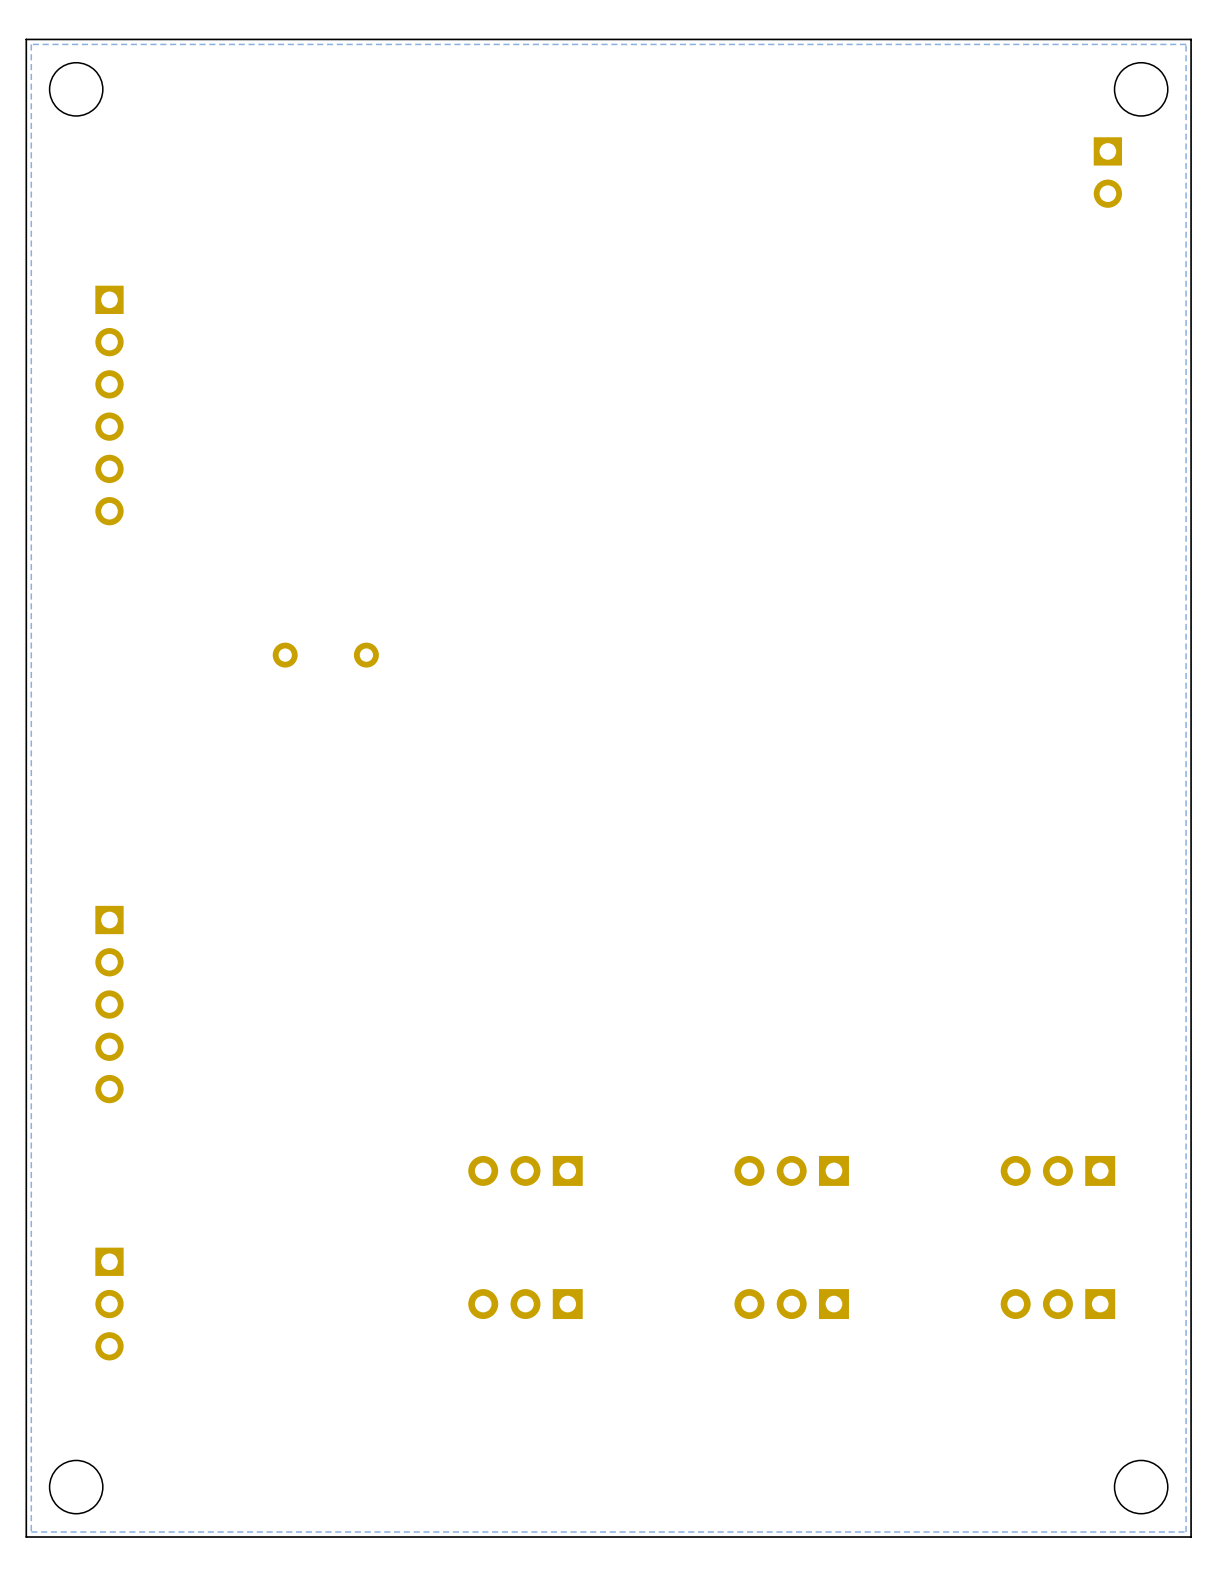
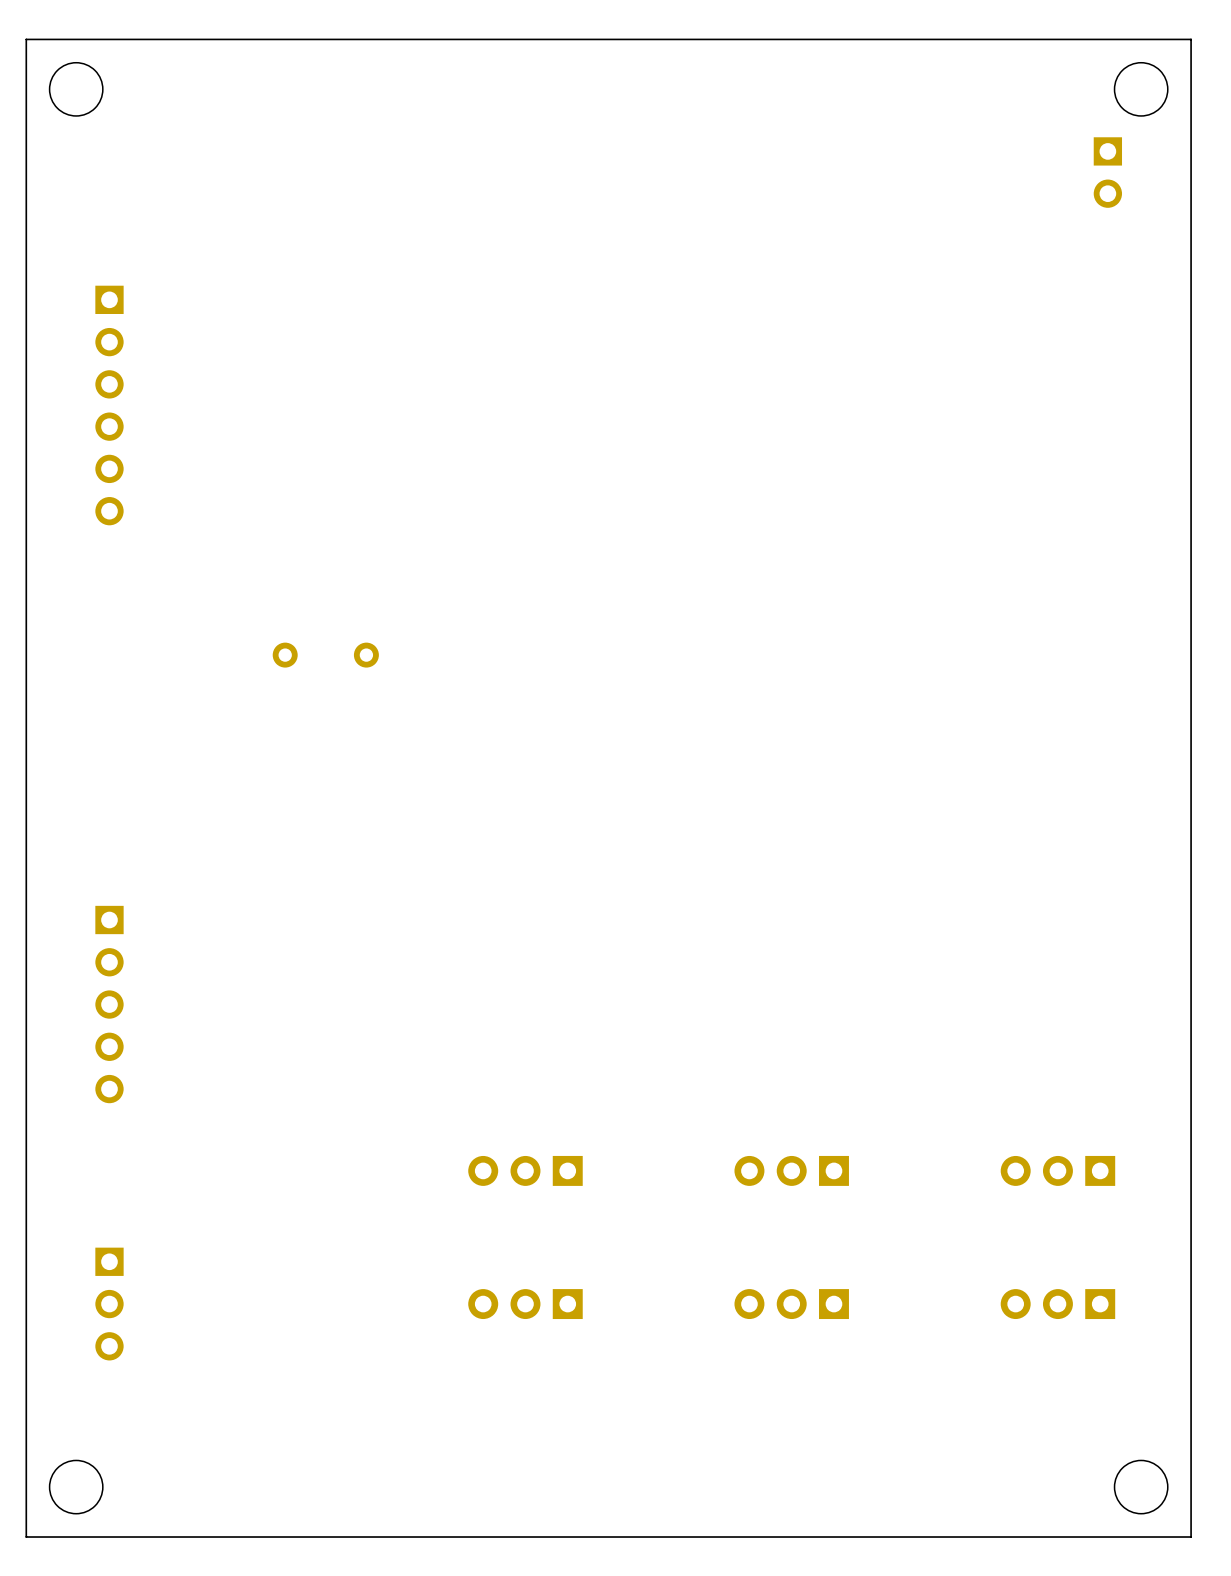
zone outline: (1186, 44) (31, 44) (31, 1532) (1186, 1532) (1186, 44) -> none

